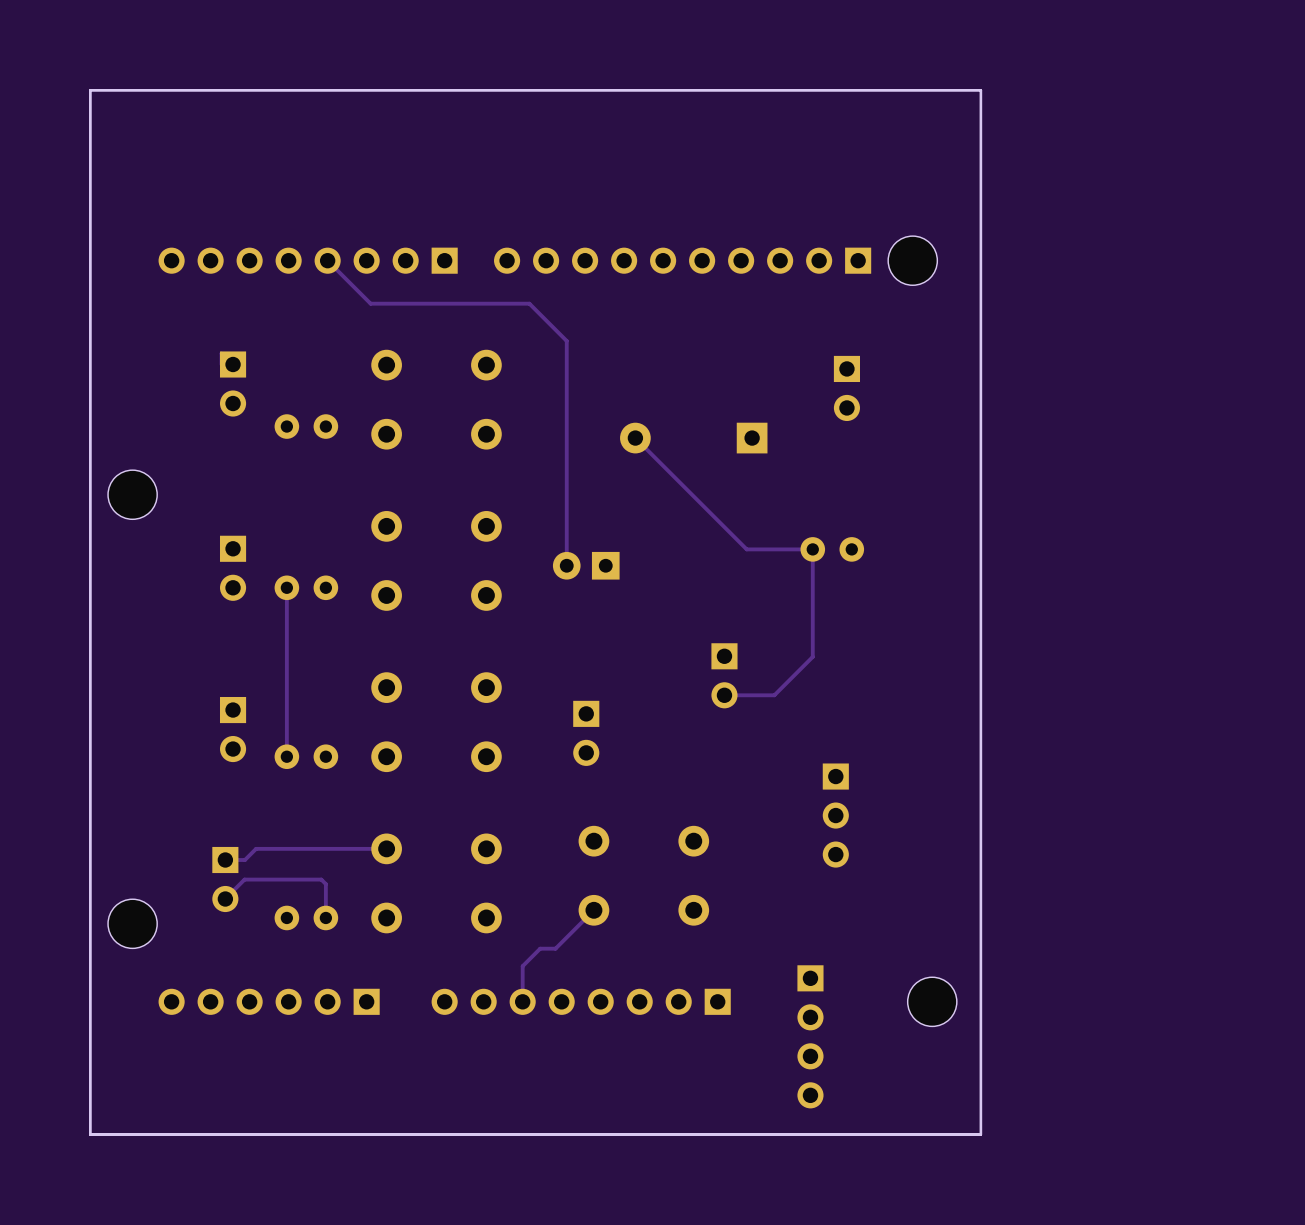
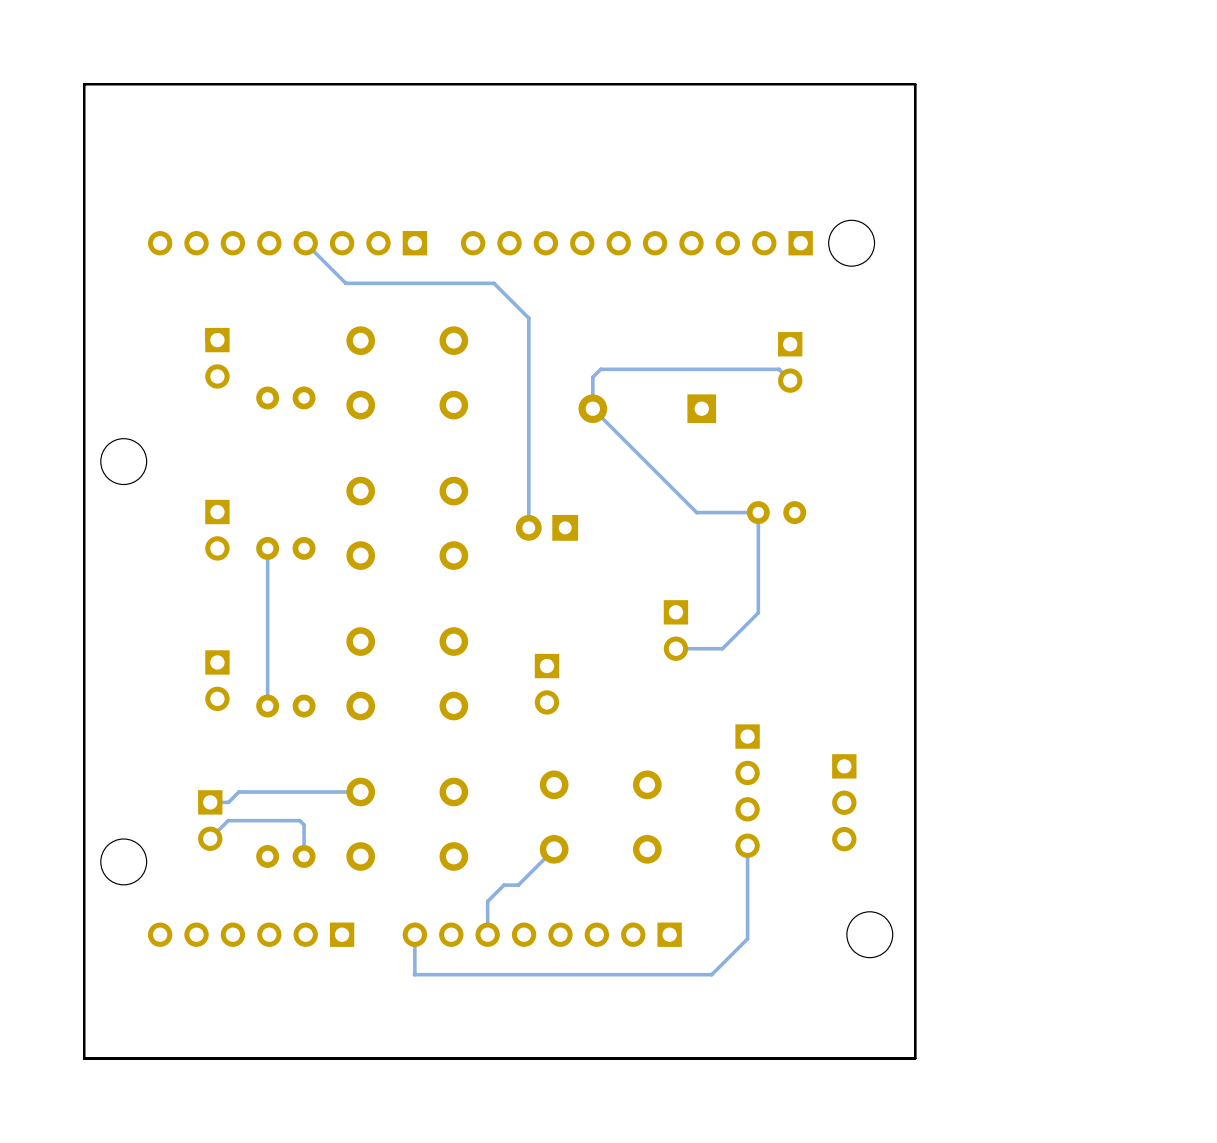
track: none -> (790, 380) (778, 369) (600, 369) (592, 377) (592, 408)
part position: (835, 815) -> (844, 802)
track: none -> (747, 845) (747, 938) (711, 974) (414, 974) (414, 934)
part position: (810, 1036) -> (747, 791)

